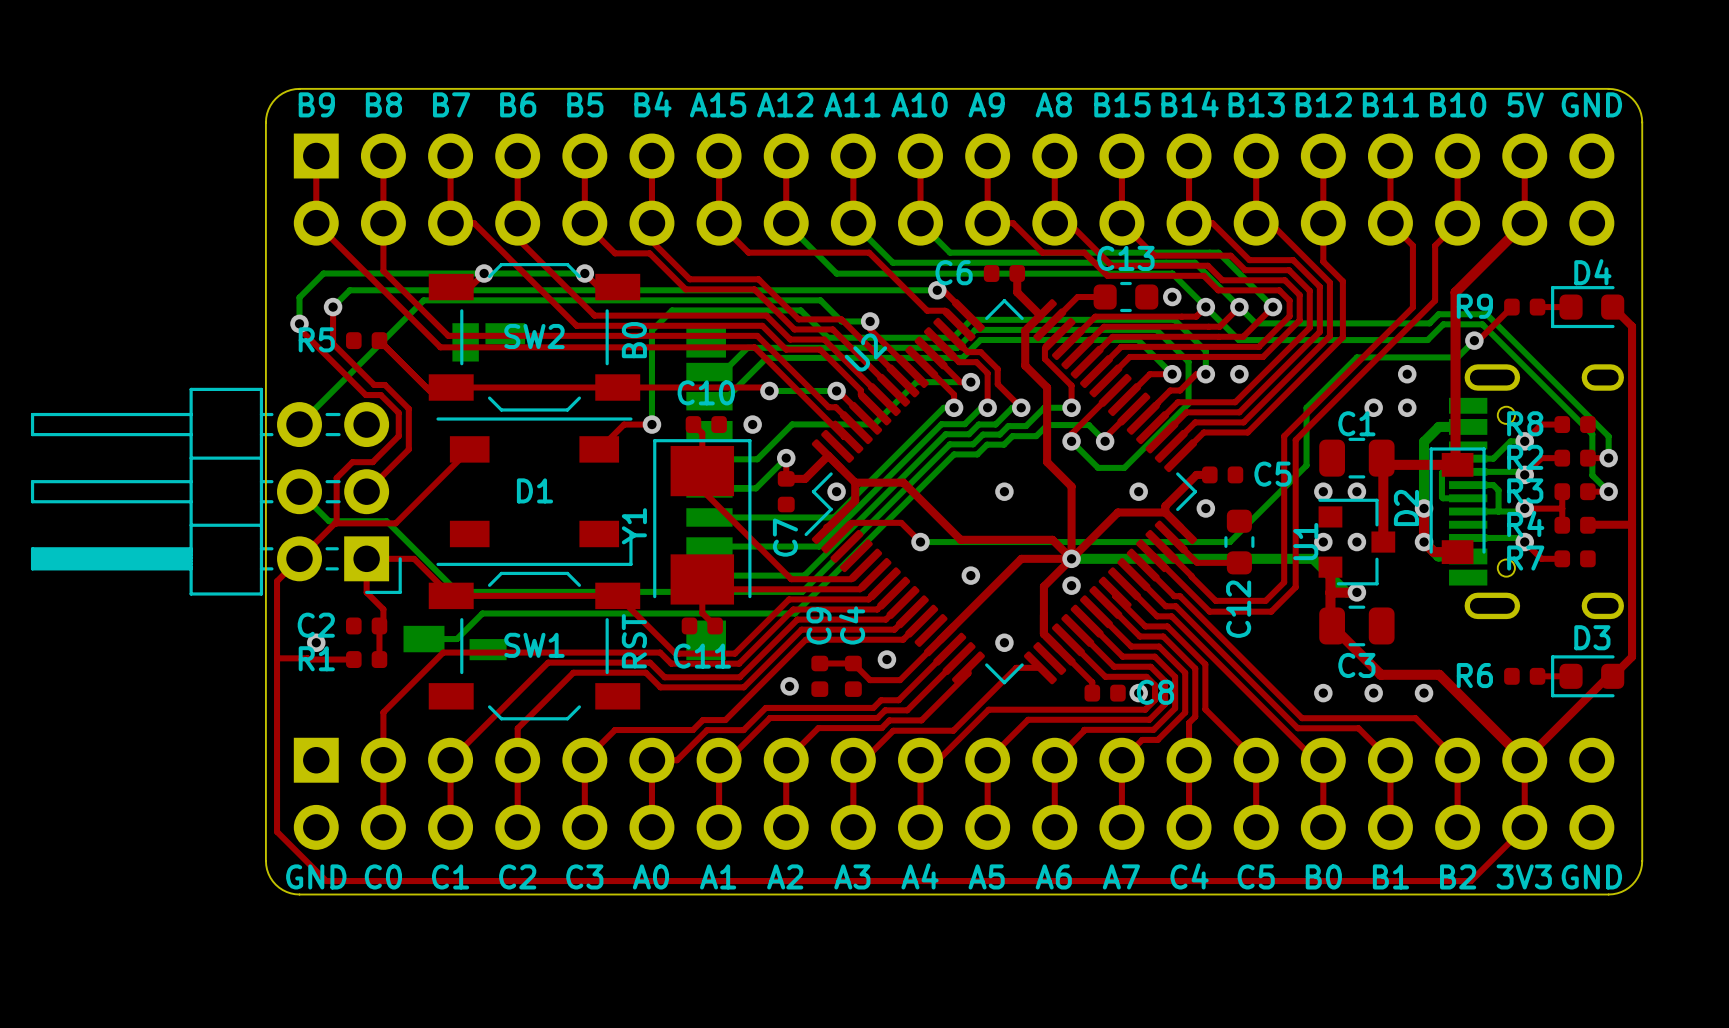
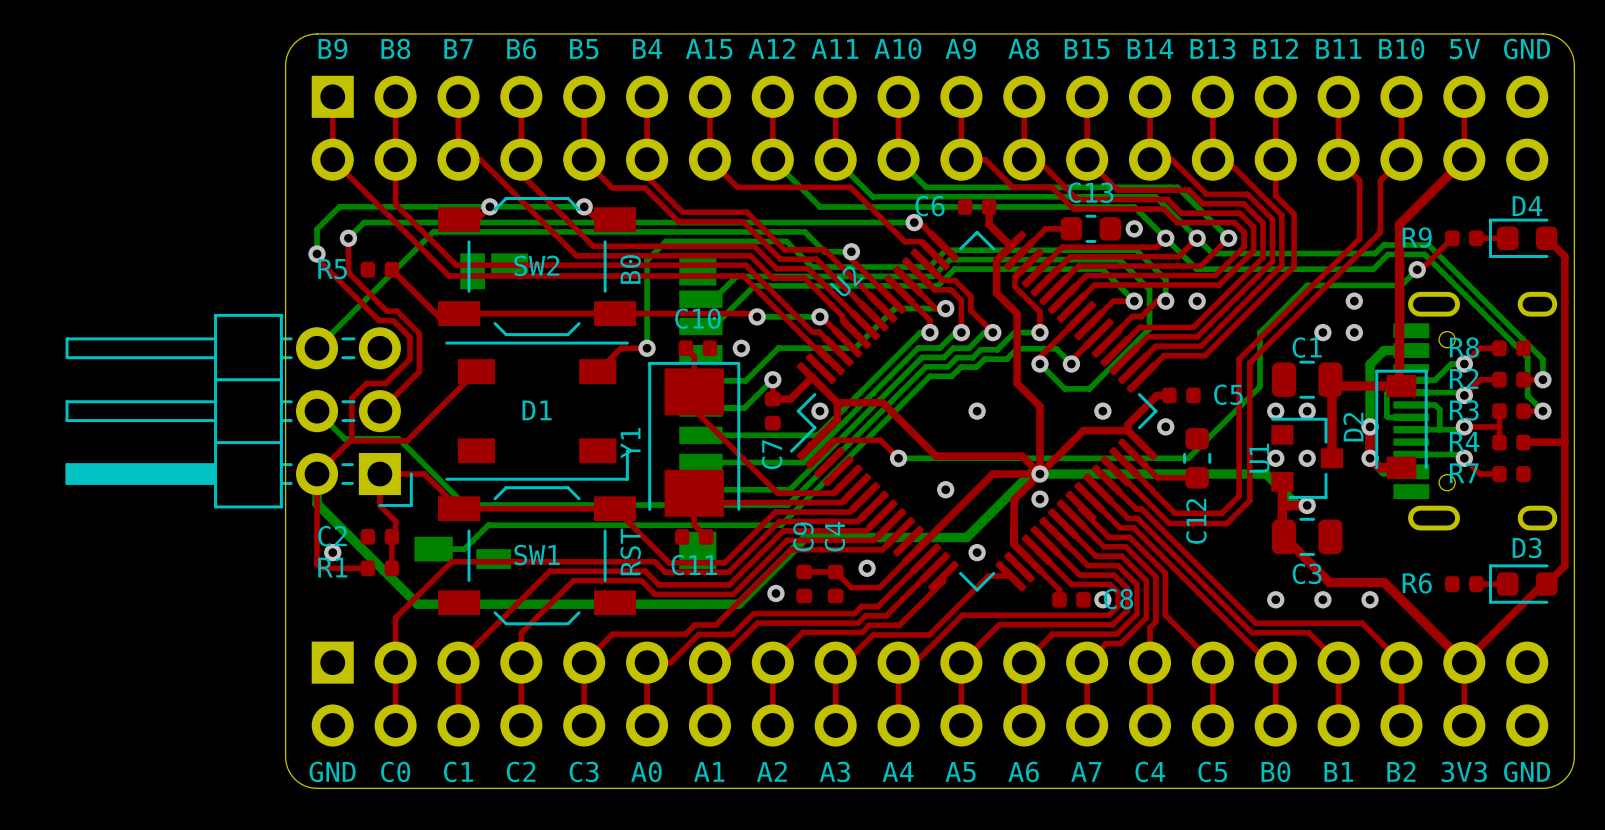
top track: (299, 558) (277, 581) (277, 831) (326, 881) (1471, 881) (1524, 827) -> none
bottom track: none -> (317, 474) (317, 503) (417, 604) (738, 604) (805, 537) (966, 537) (1030, 474) (1039, 474)
top track: (277, 658) (308, 659) -> (317, 474) (317, 564) (321, 568) (325, 568)

